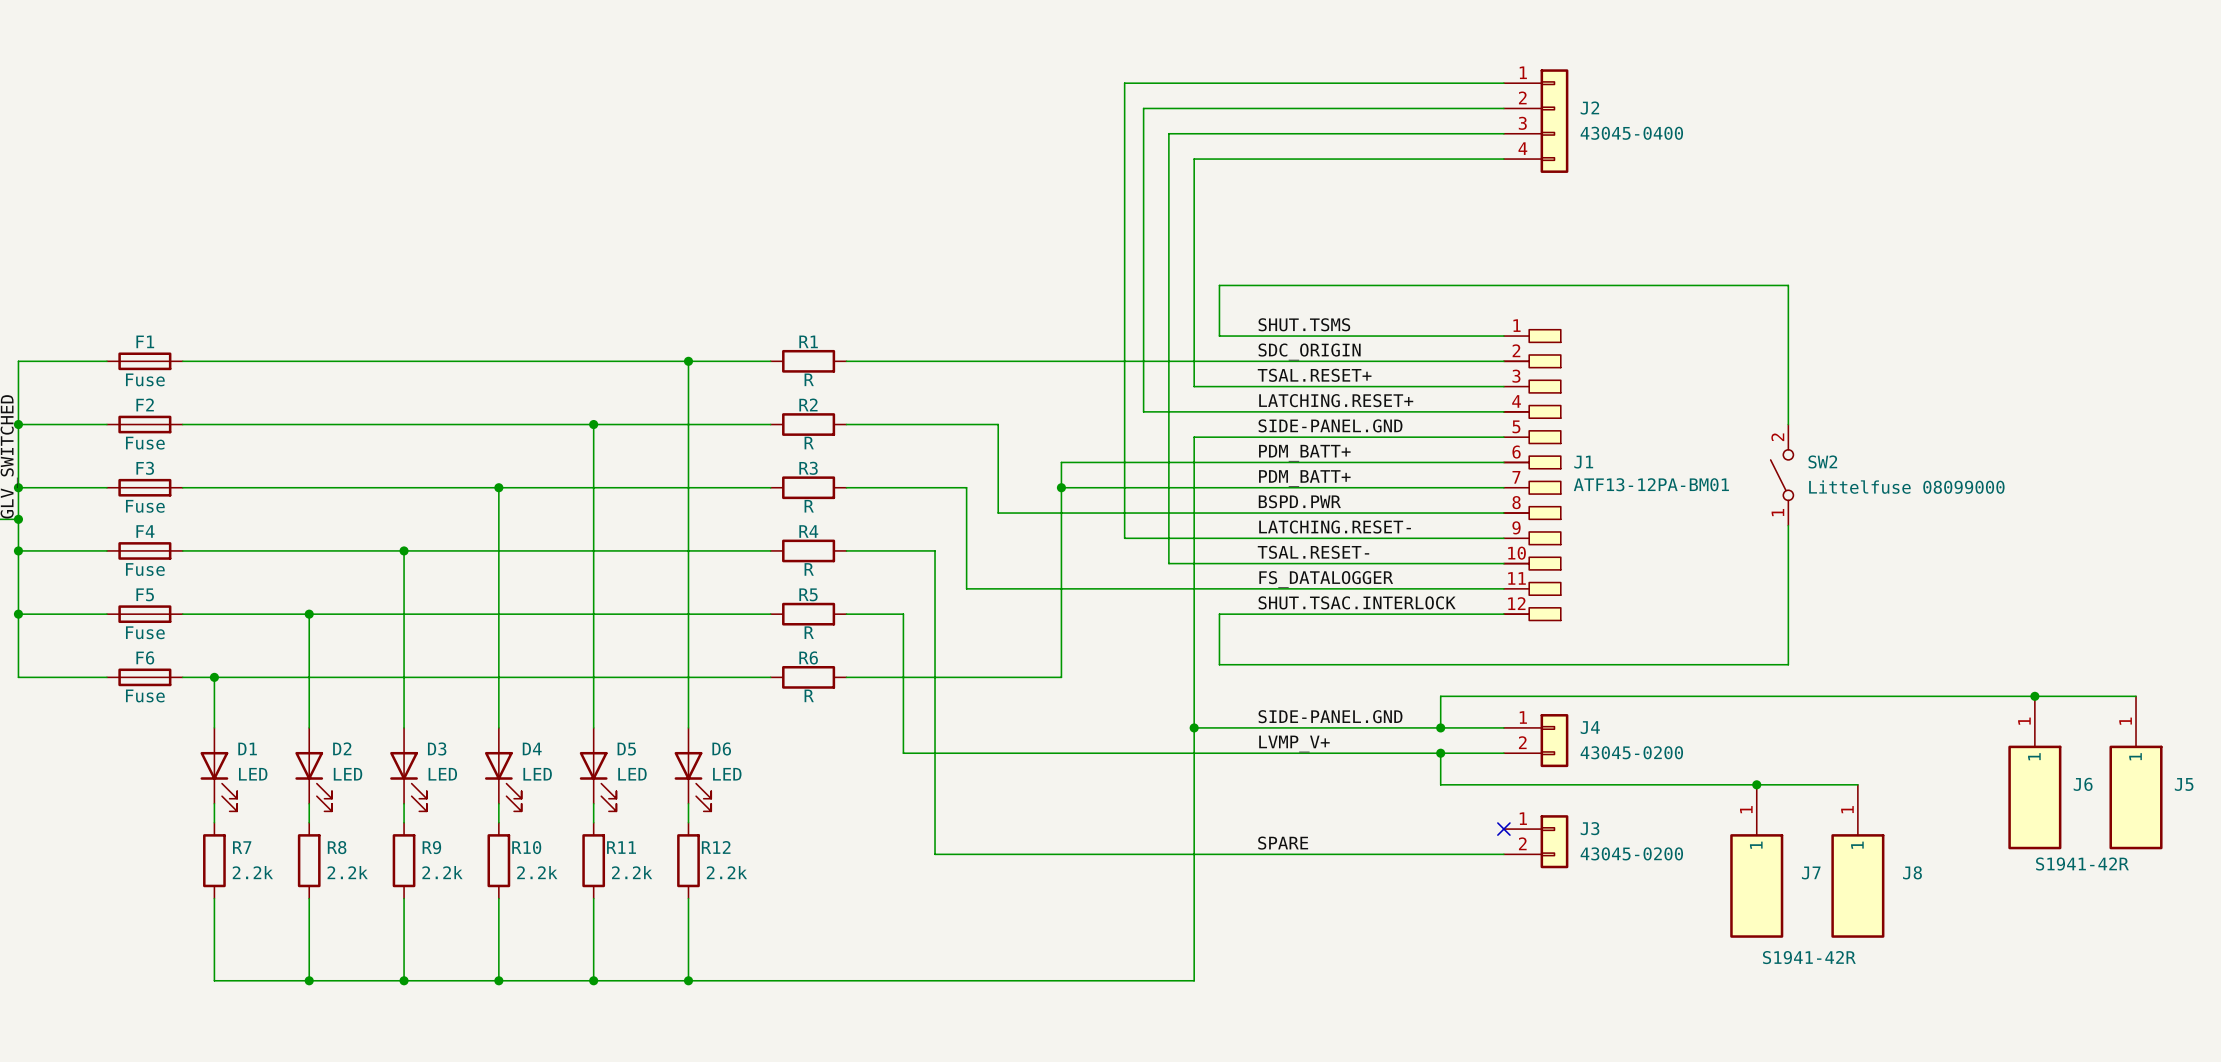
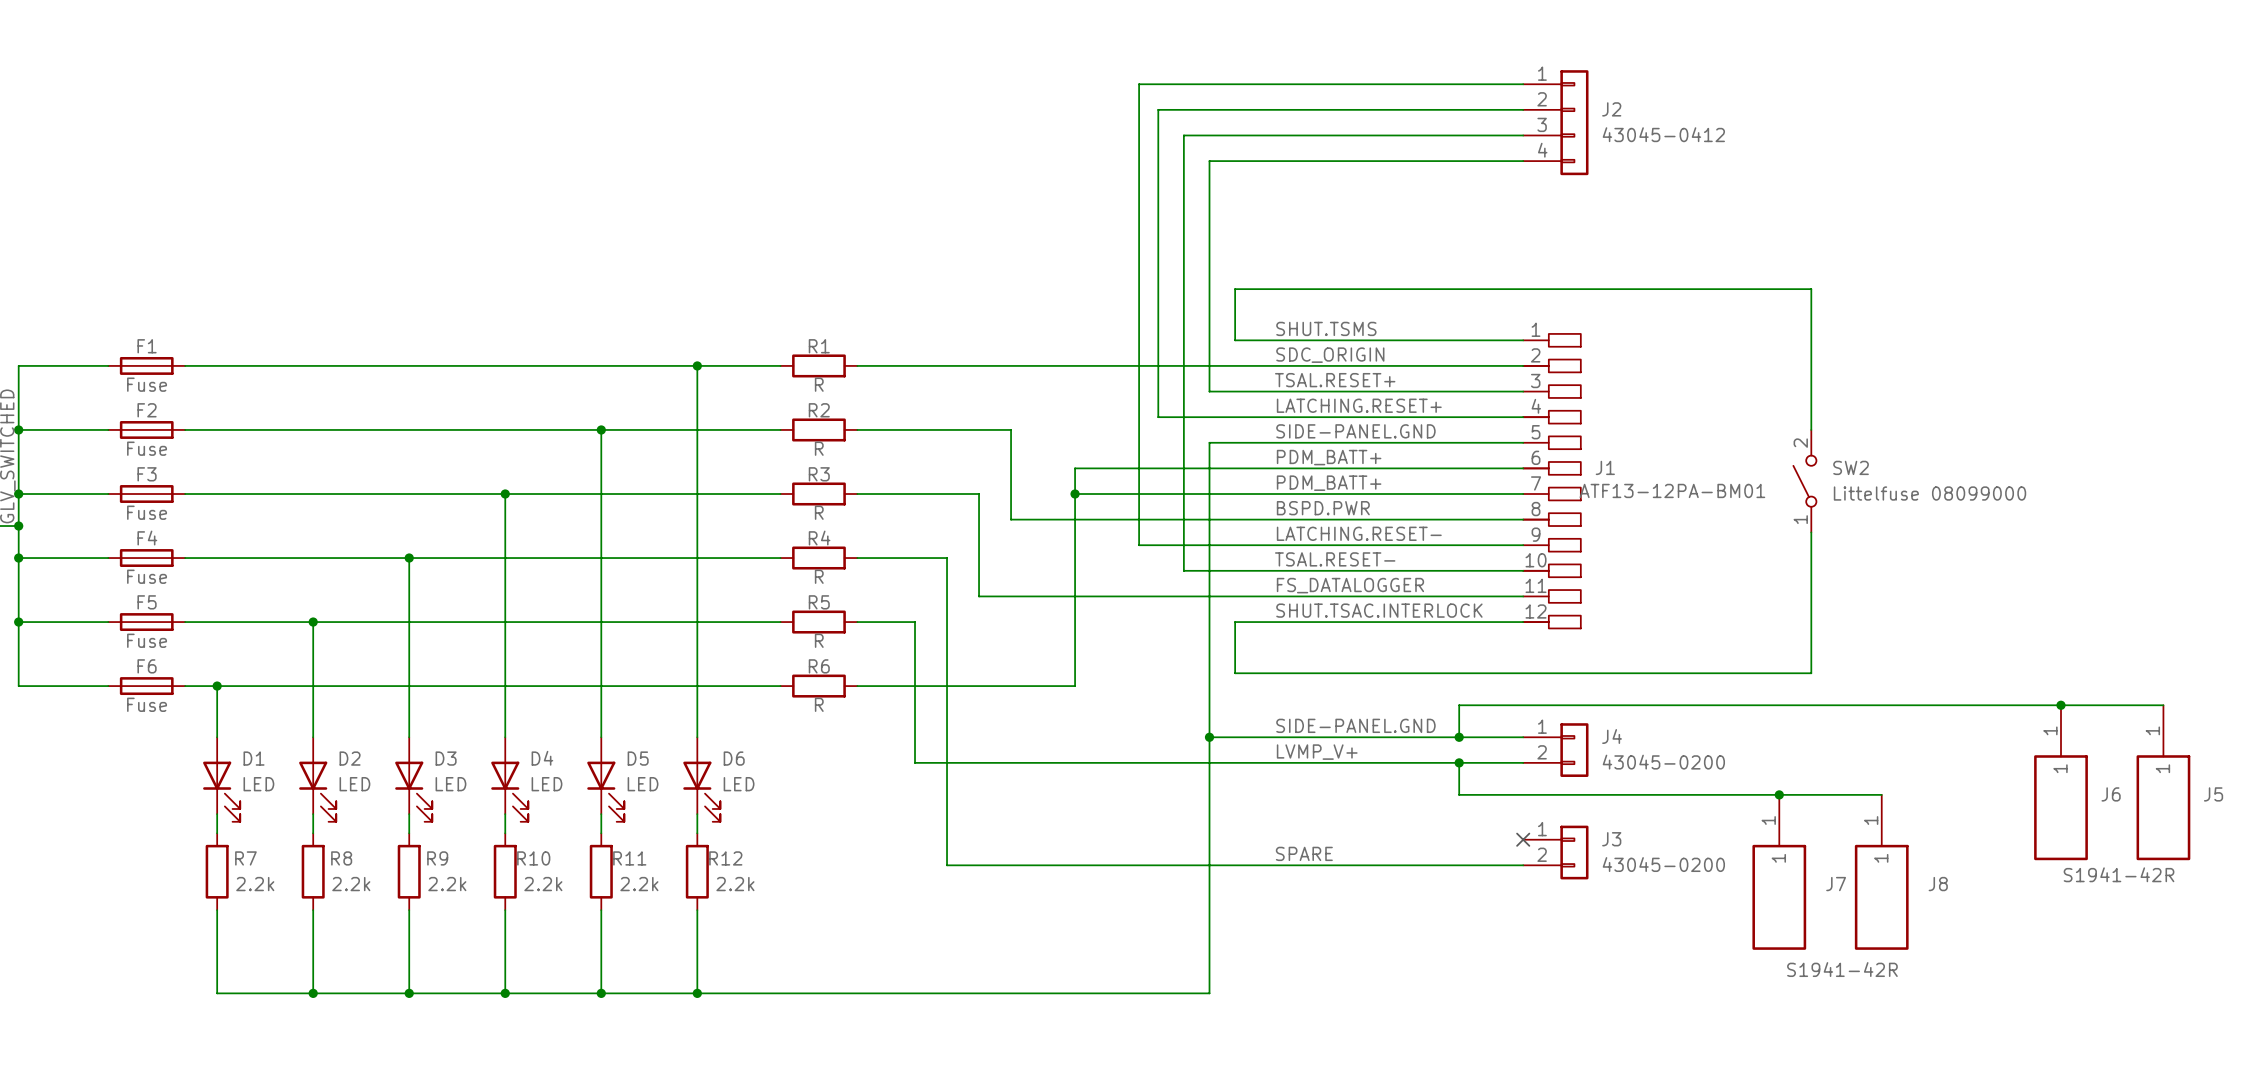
J2 value: 43045-0400 (1631, 133) -> 43045-0412 (1663, 134)

